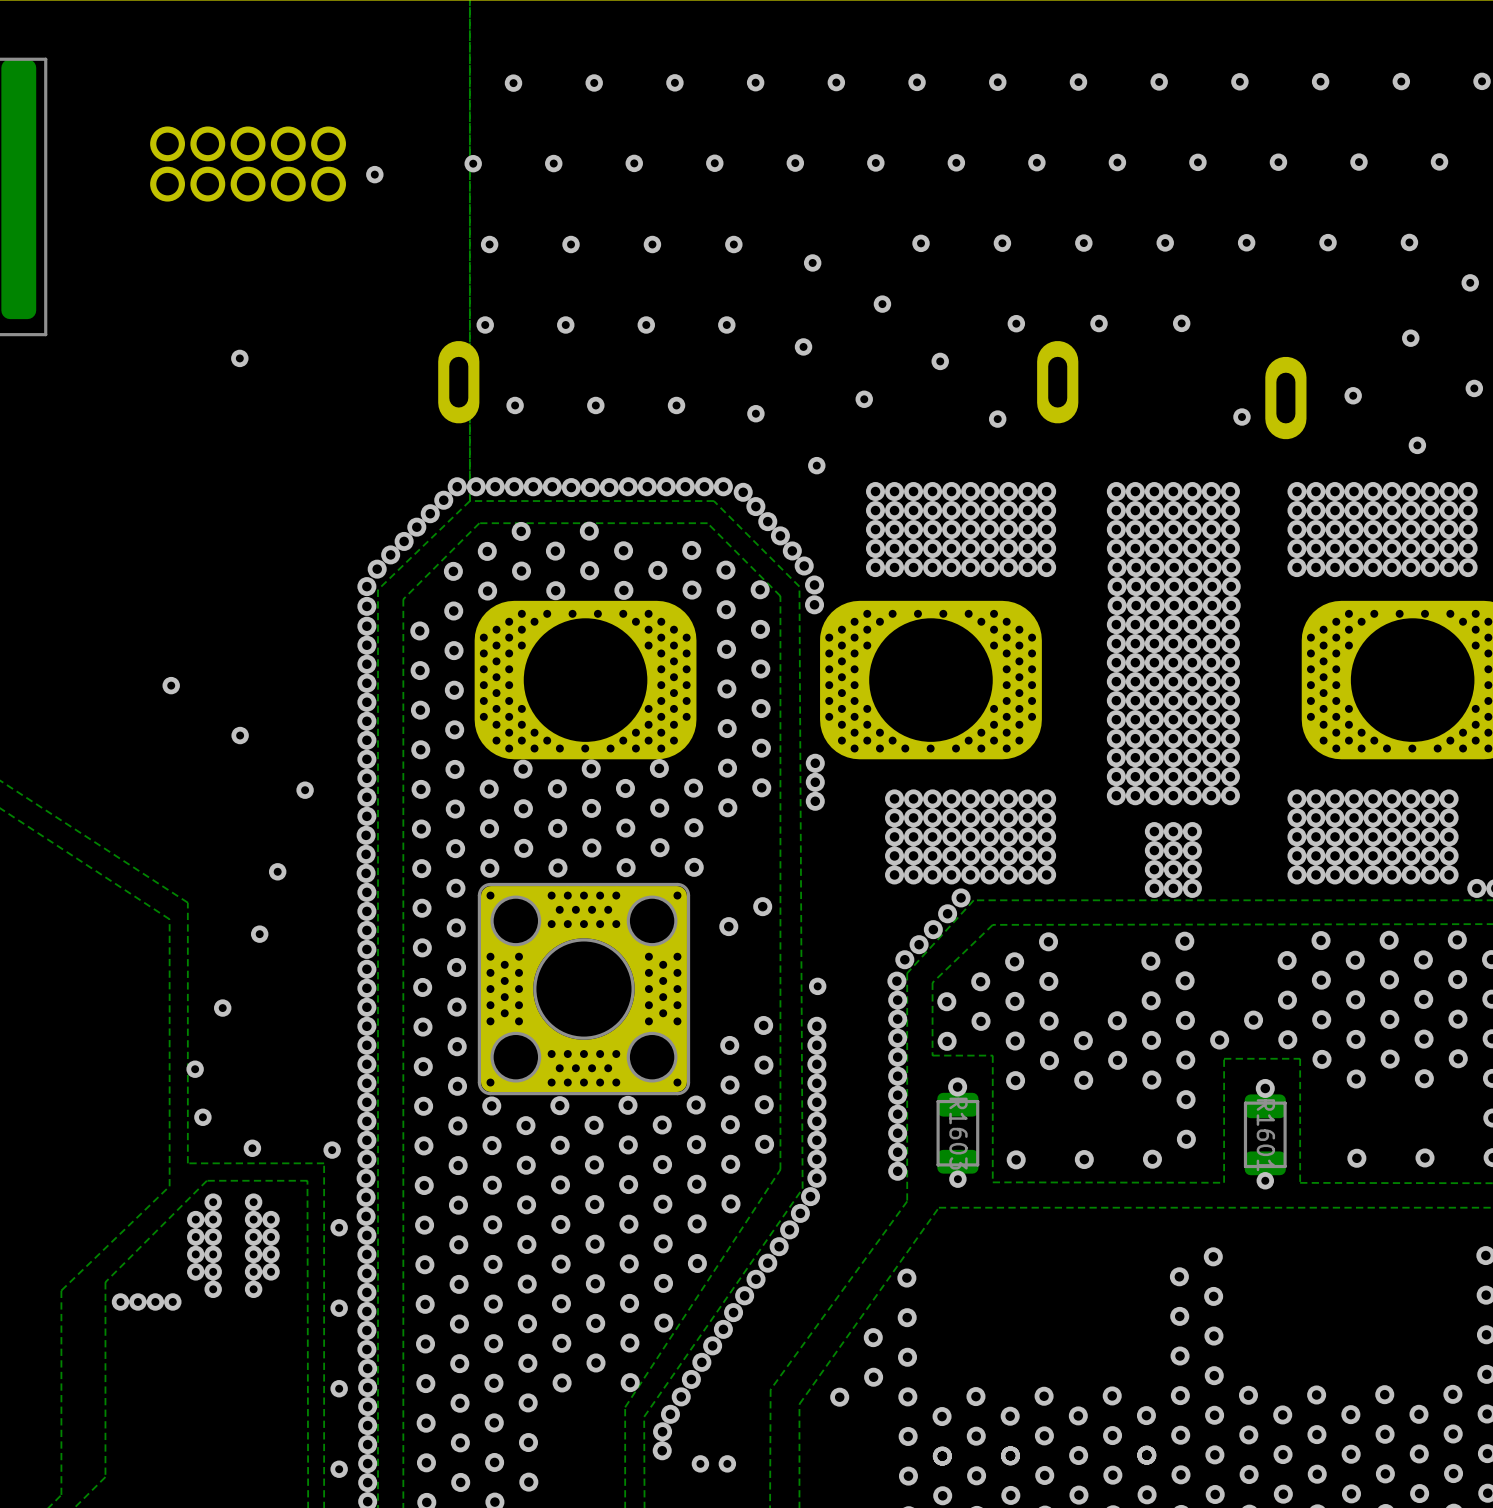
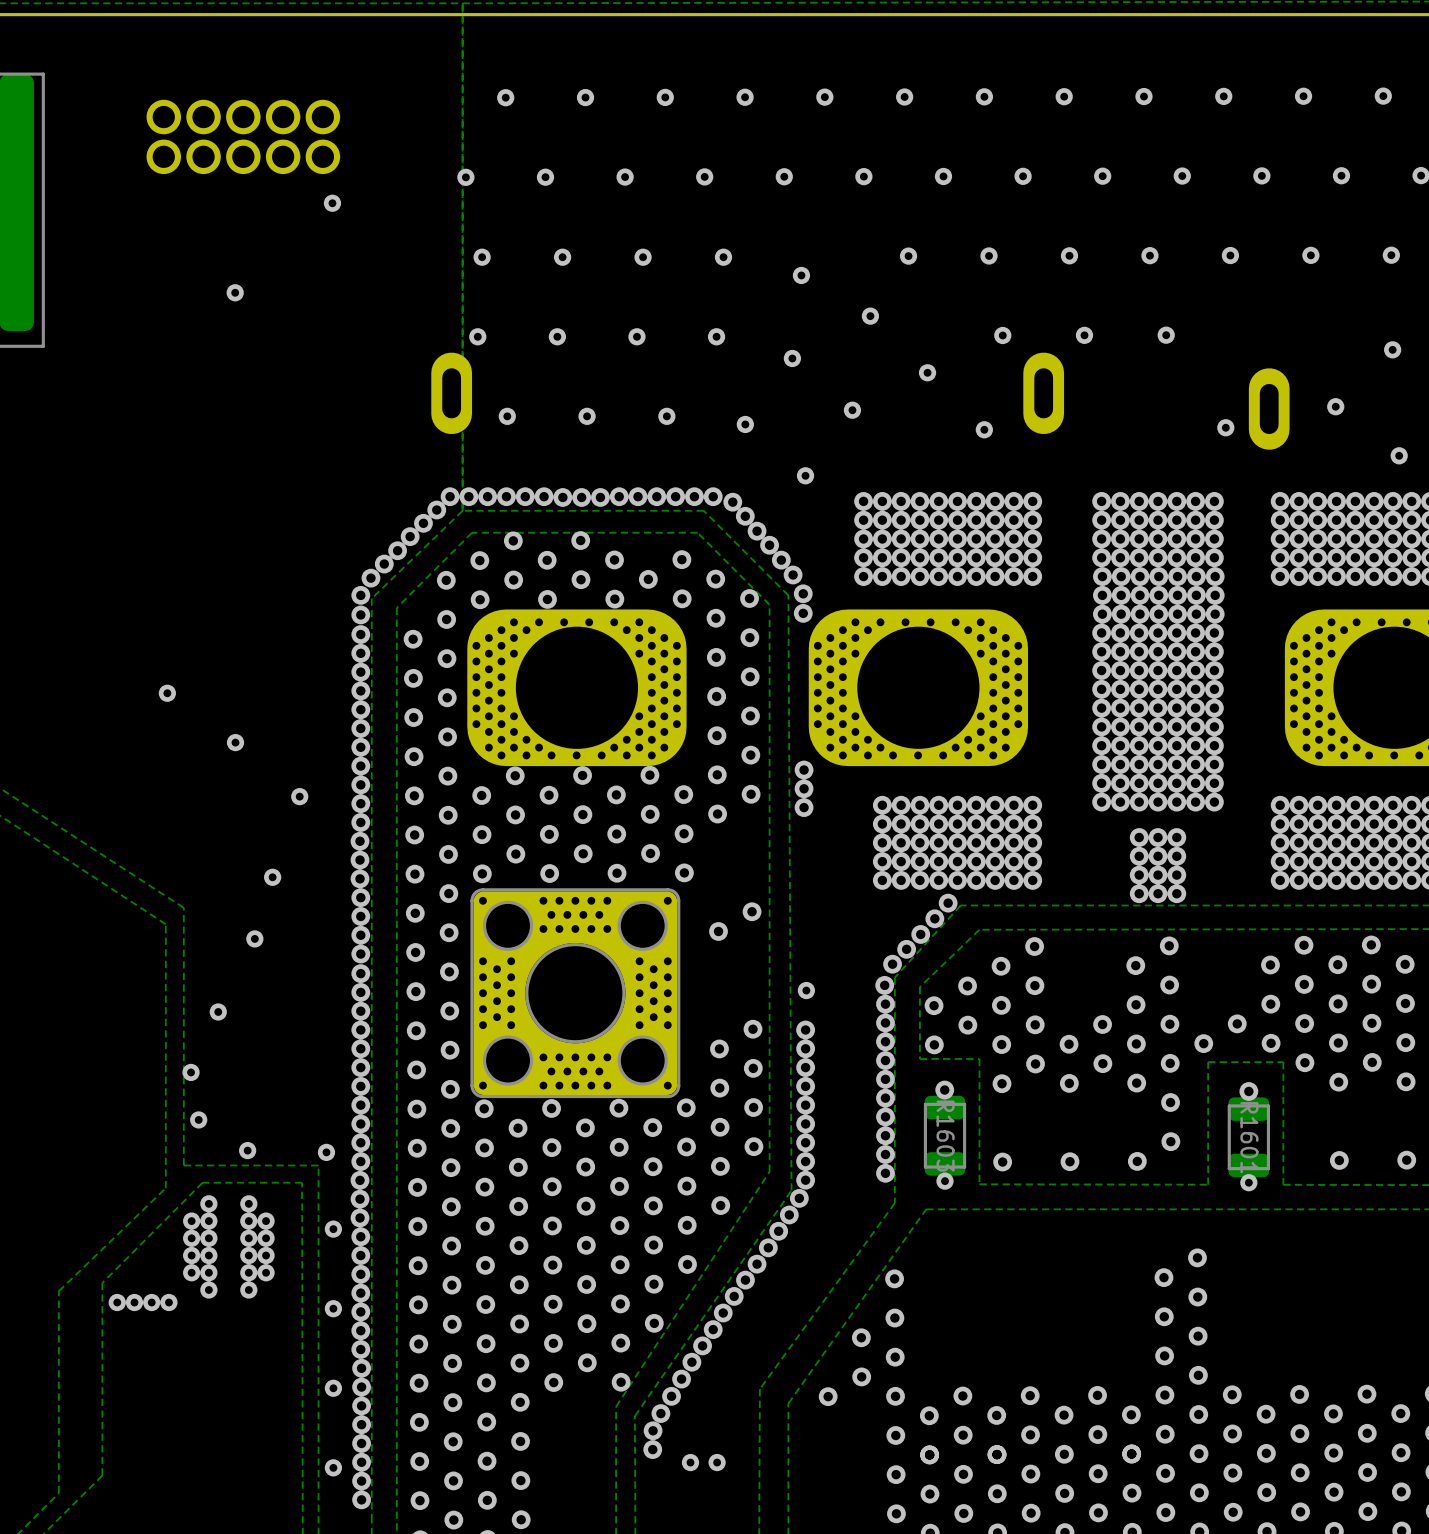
part position: (248, 164) -> (243, 136)
via position: (374, 174) -> (332, 203)
via position: (239, 358) -> (235, 292)

